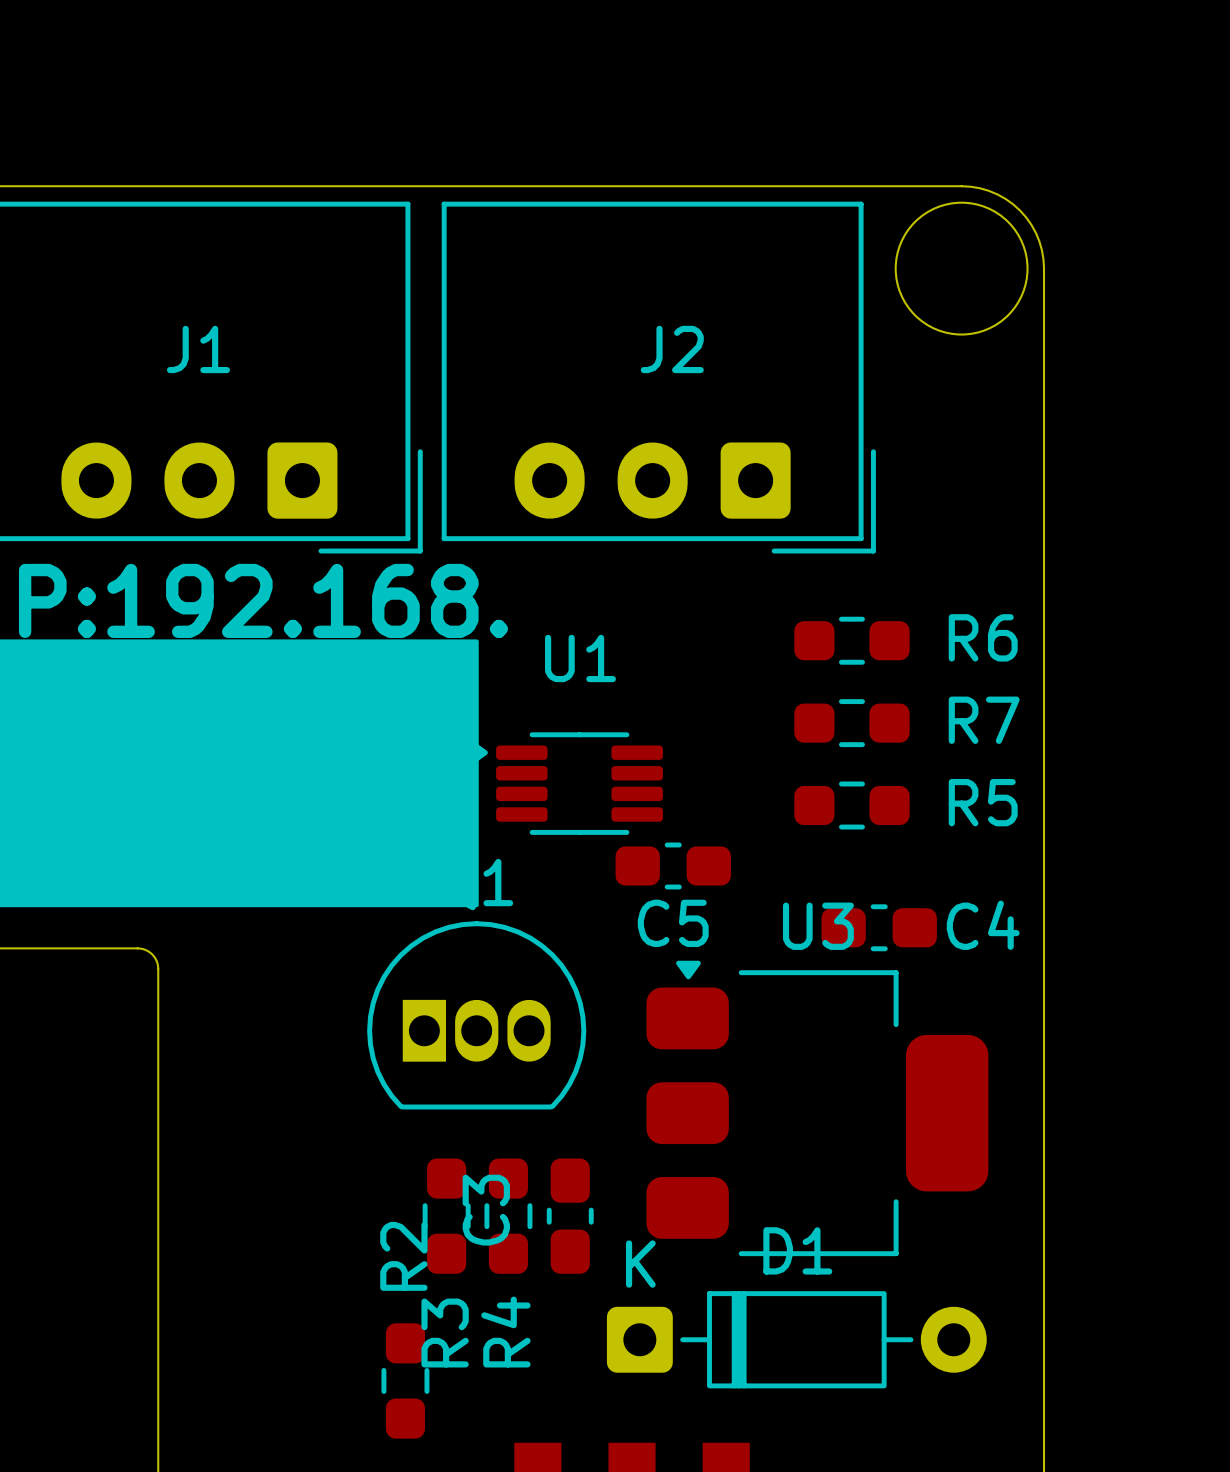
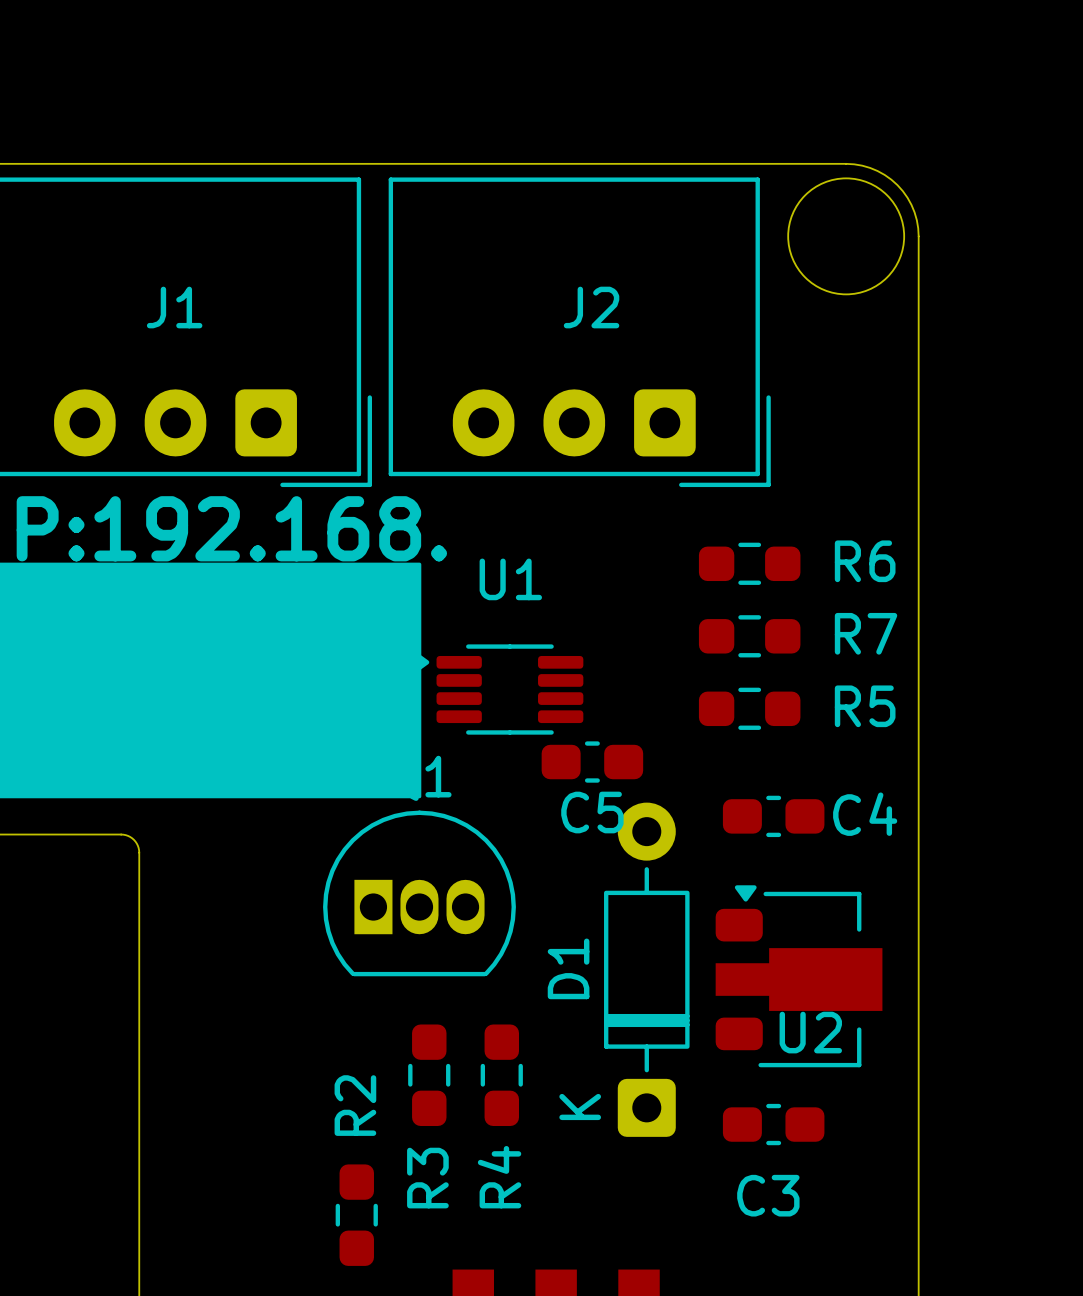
U3: (817, 1108) -> none
U2: none -> (799, 976)
C3 name position: C3 (486, 1210) -> C3 (768, 1195)
R3 position: (446, 1216) -> (429, 1075)
R4 position: (508, 1216) -> (501, 1075)
C3 rotation: 0° (570, 1216) -> 90° clockwise (773, 1124)
C3 position: (570, 1216) -> (773, 1124)
D1 rotation: 0° (796, 1339) -> 90° counterclockwise (646, 969)
D1 position: (796, 1339) -> (646, 969)

